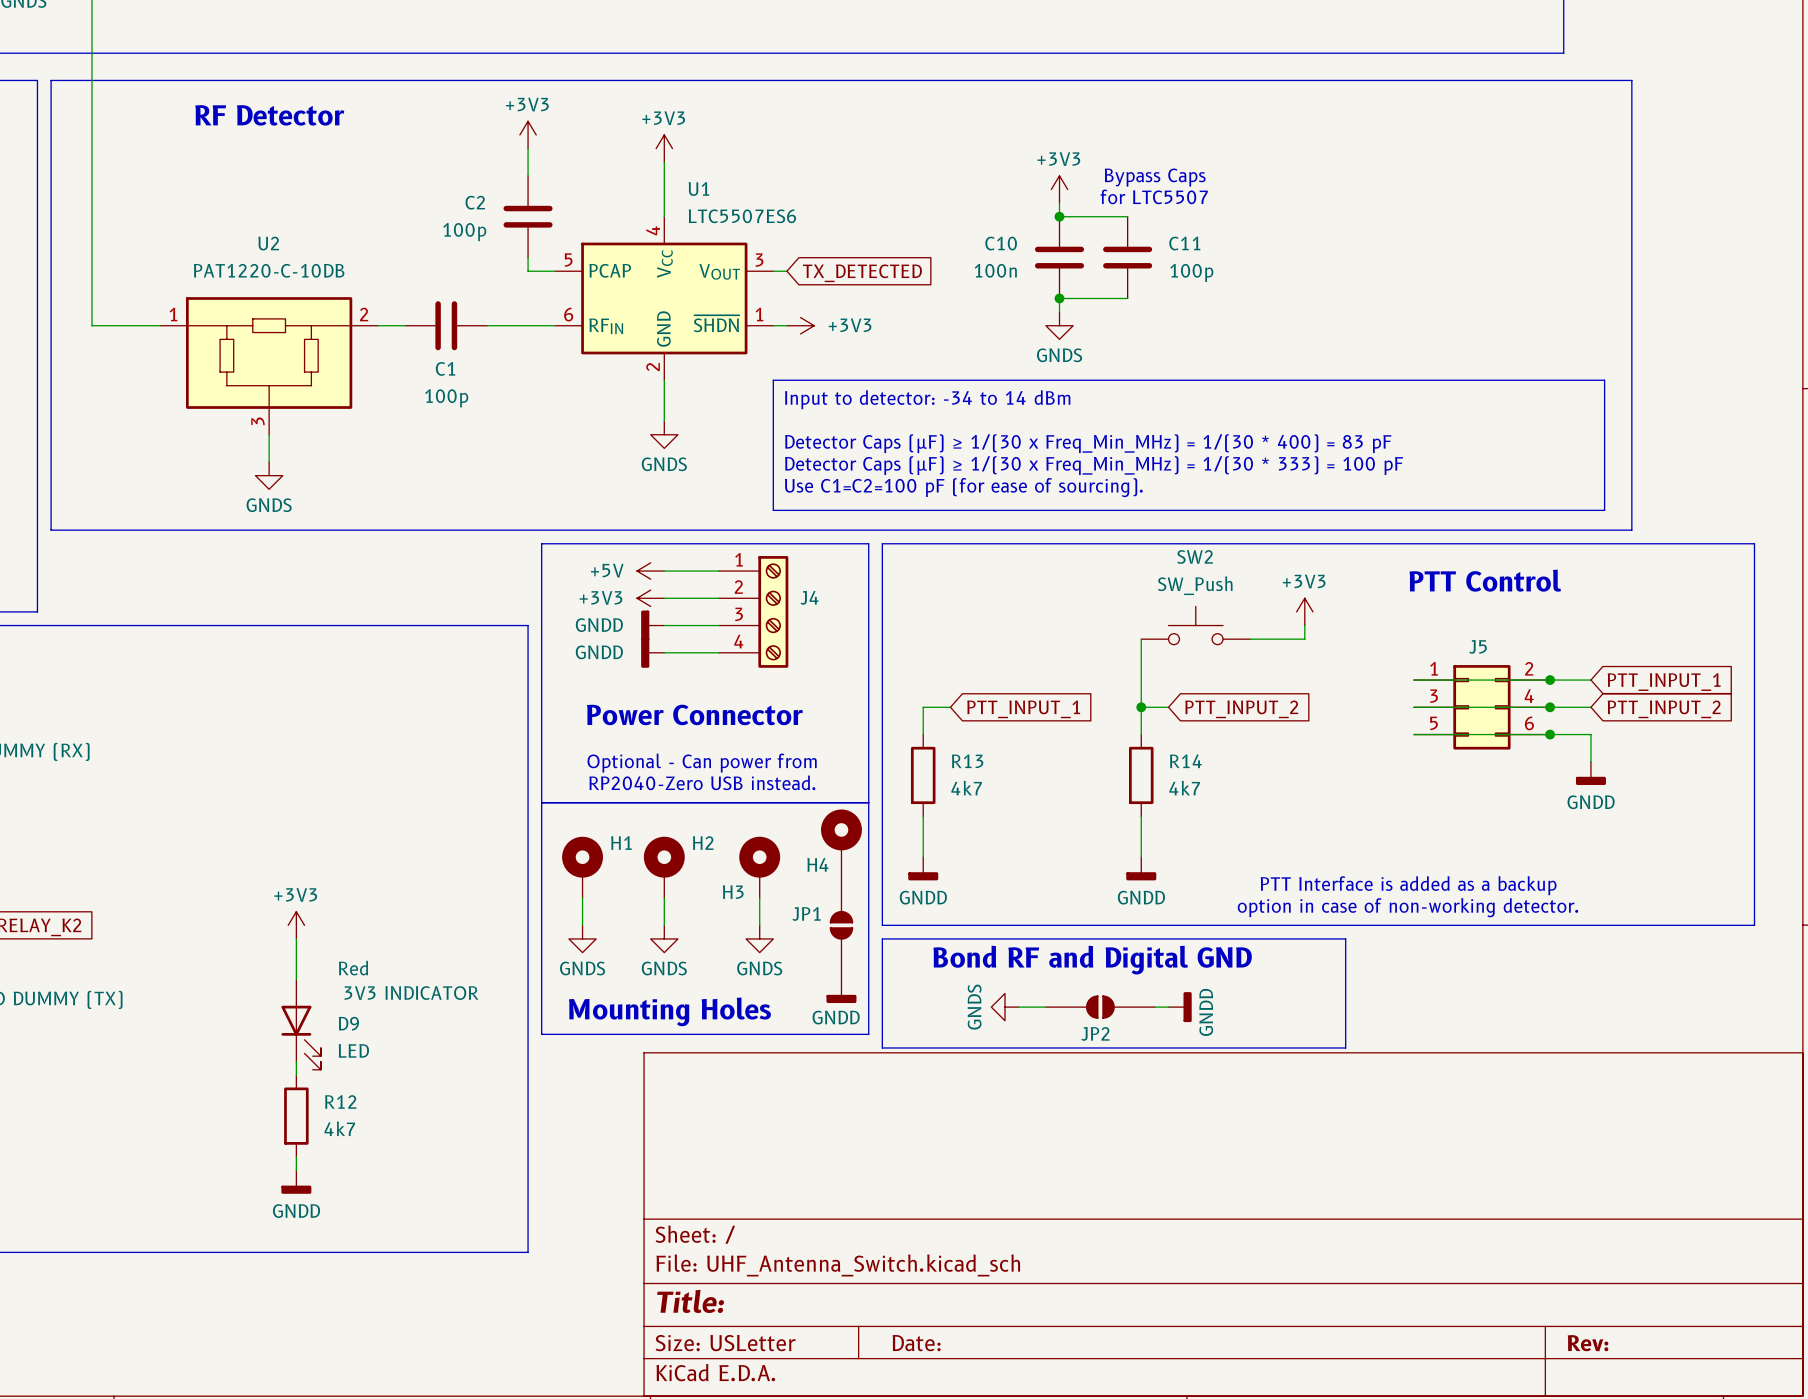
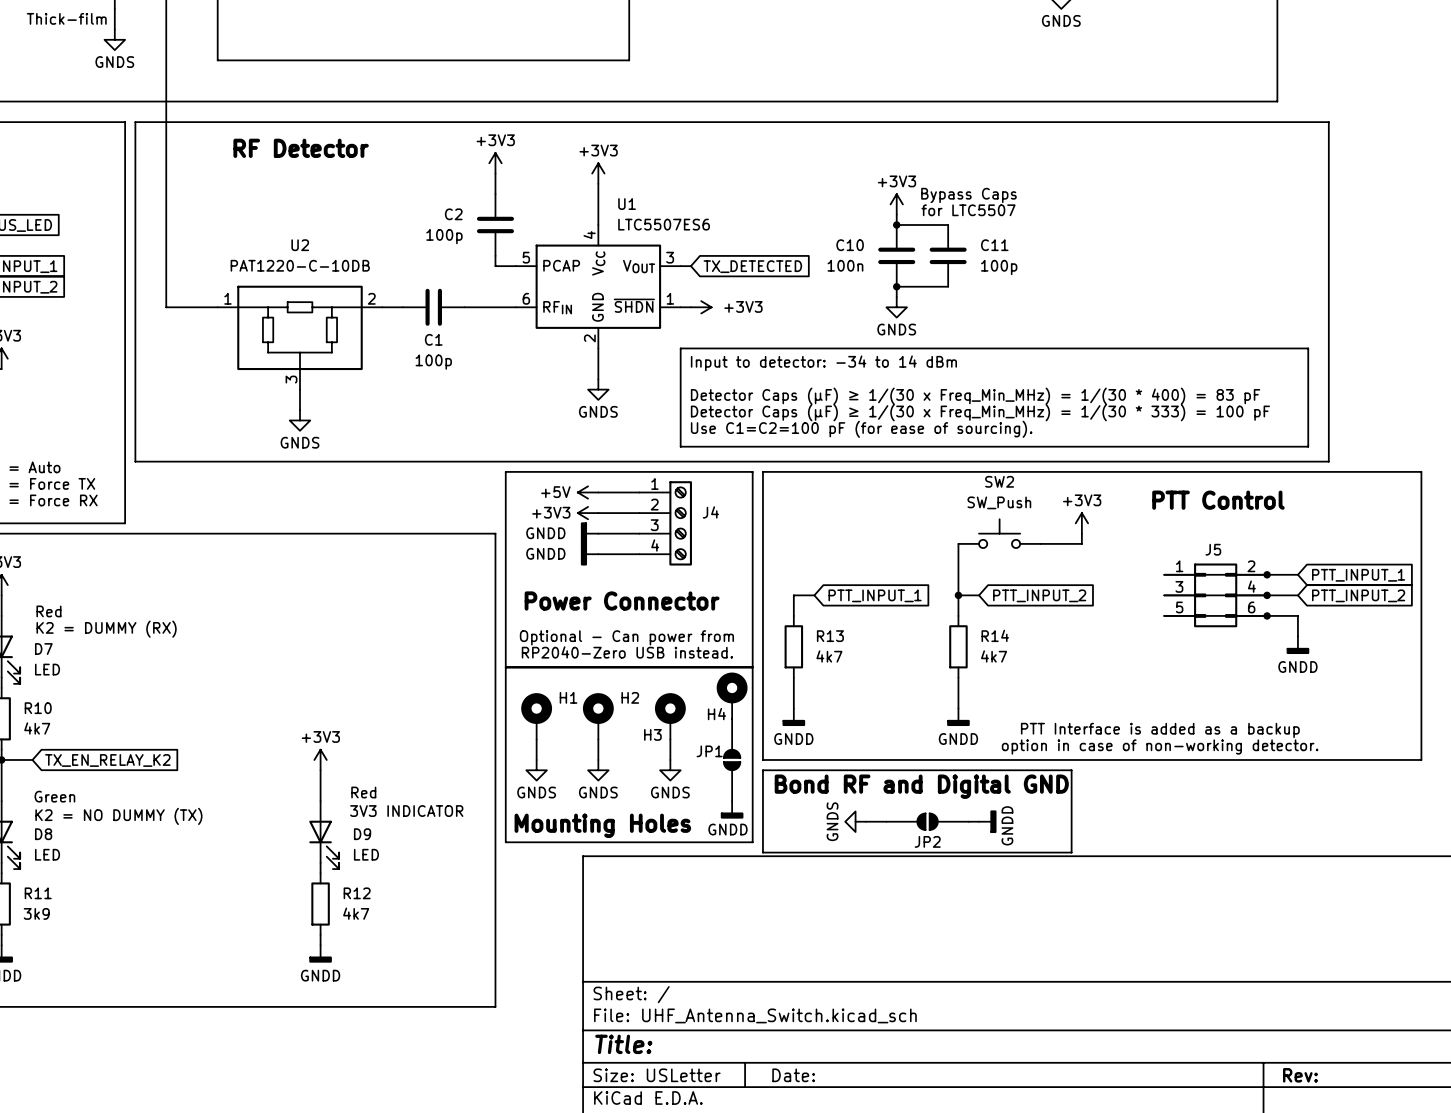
line: (1291, 938) (1345, 938) (1345, 1047) (1291, 1047) -> (1071, 770) (1071, 852)

